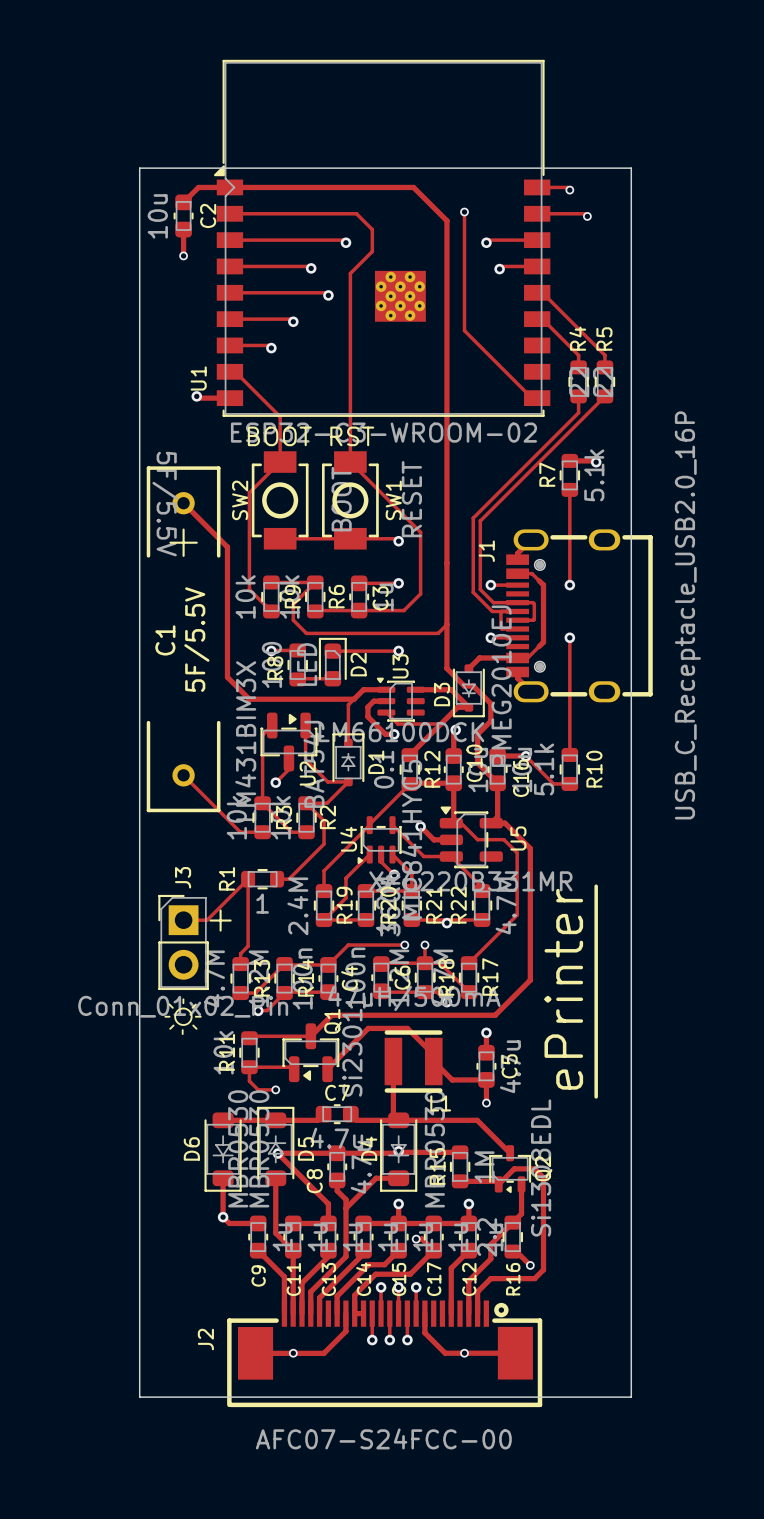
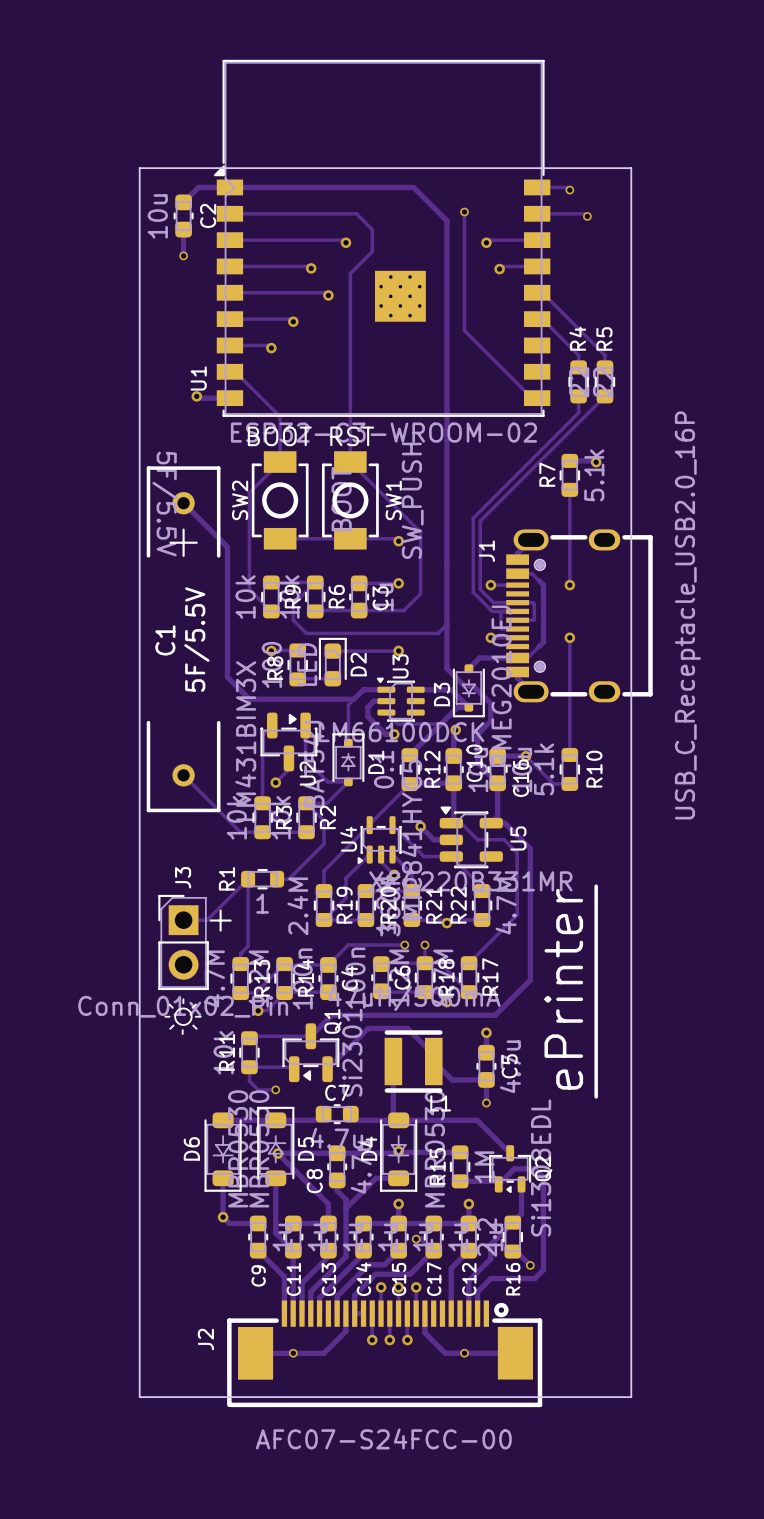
SW1 value: RESET (411, 499) -> SW_PUSH (412, 500)

